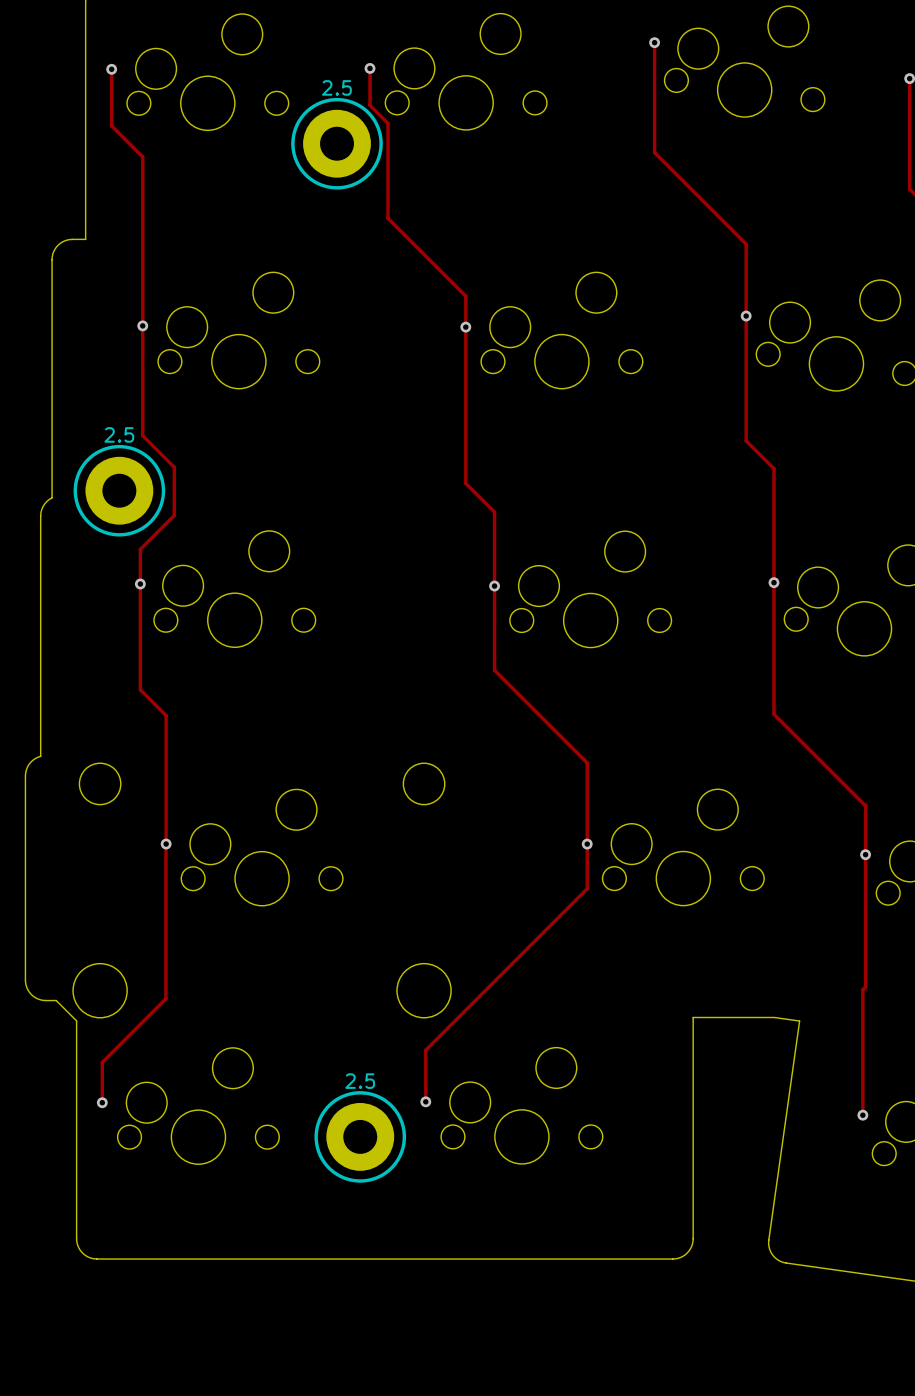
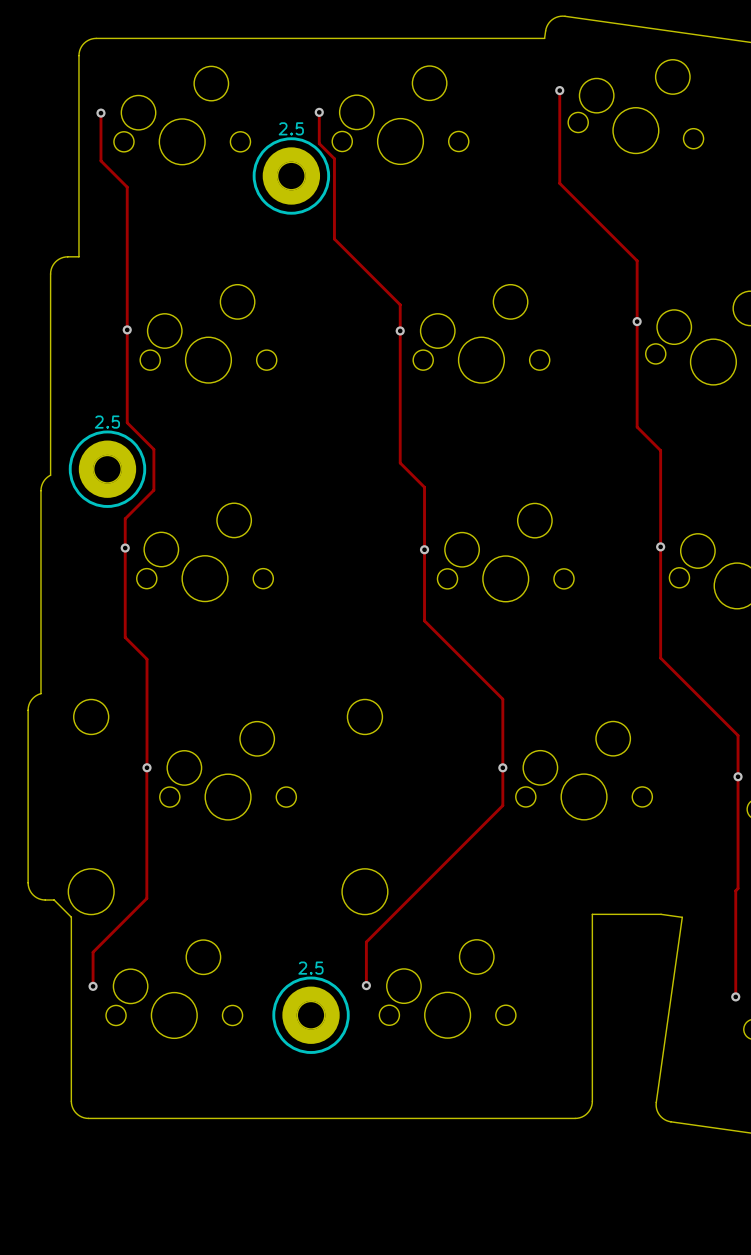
round board edge: none -> [277, 161, 306, 191]
round board edge: none -> [93, 454, 122, 484]
round board edge: none -> [296, 1000, 326, 1030]

